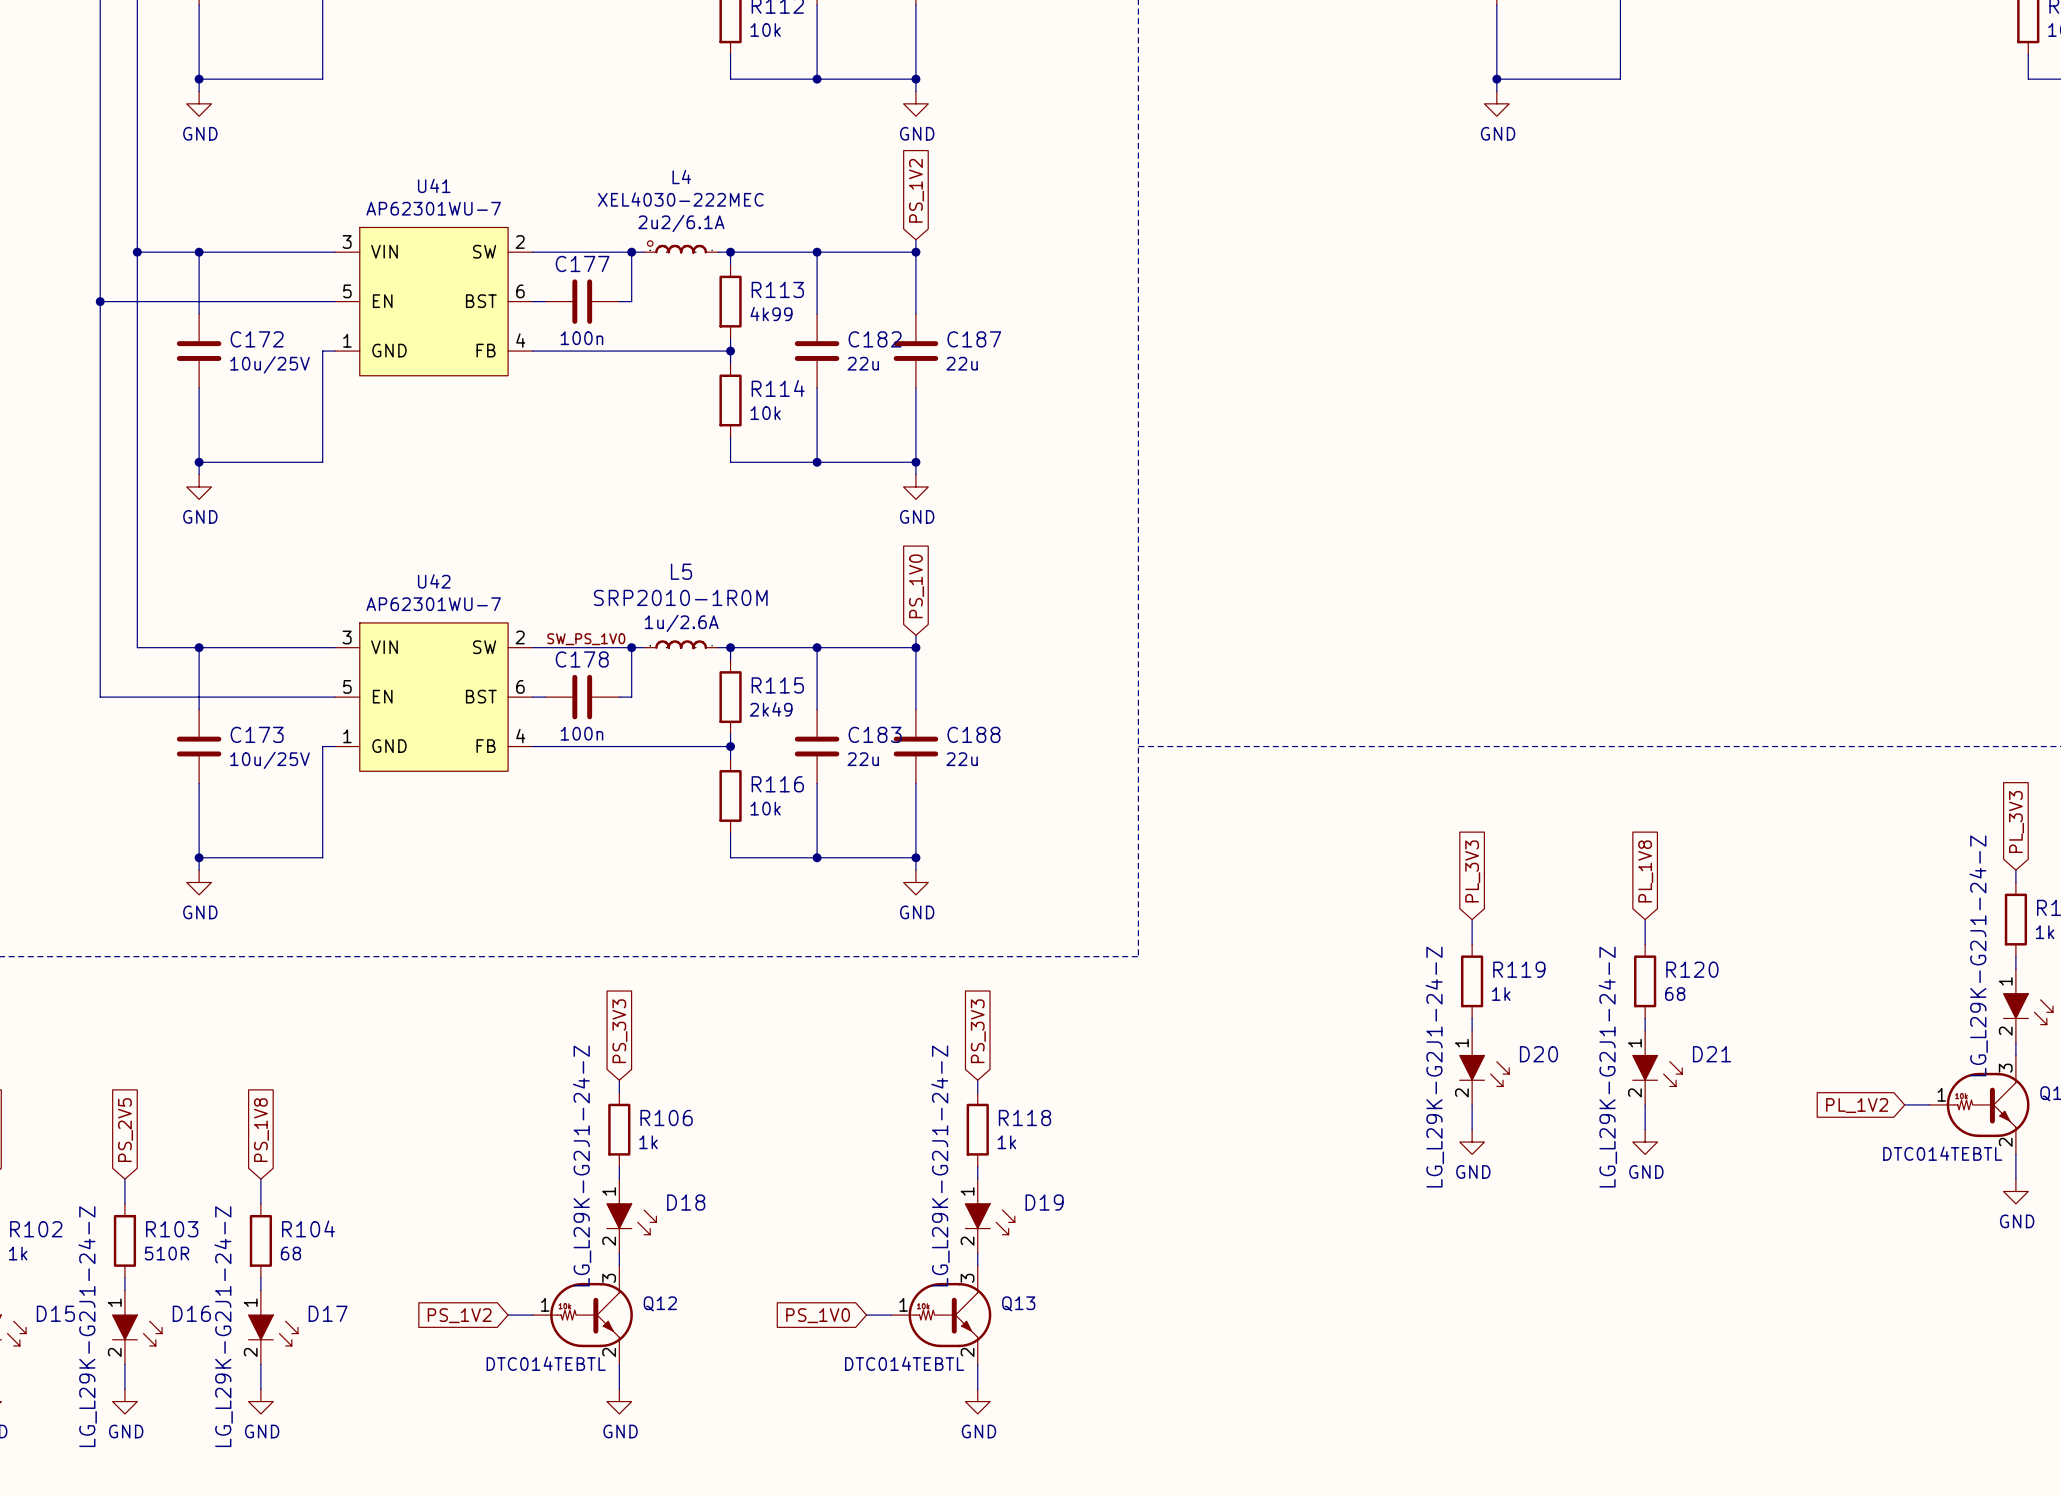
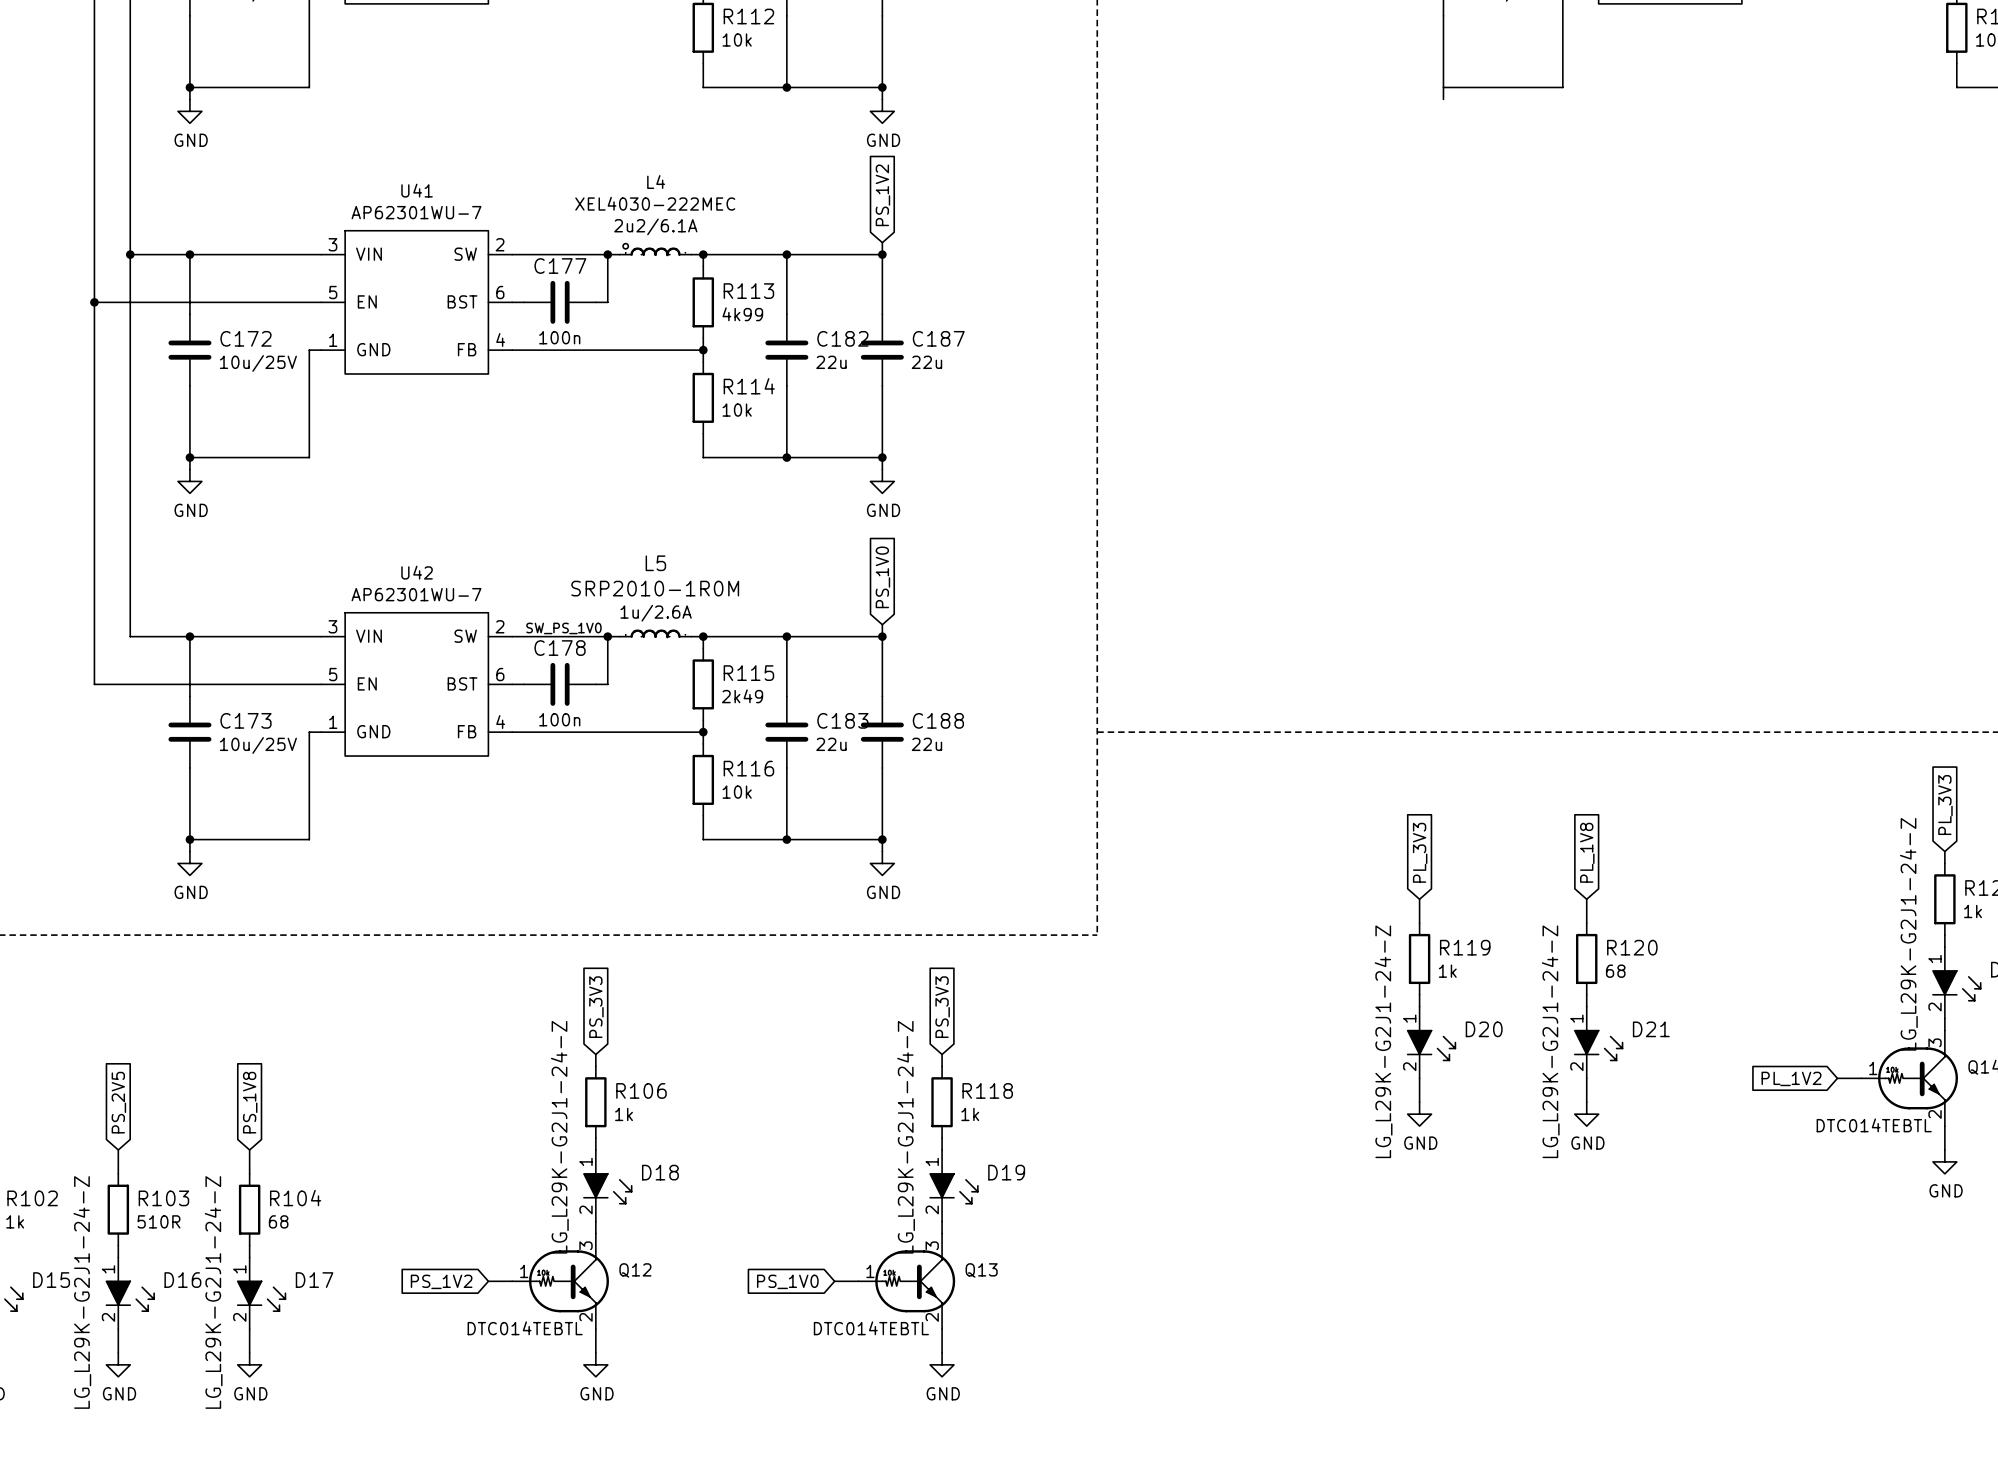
junction: (1496, 79) -> none
power symbol: GND (1496, 103) -> none

